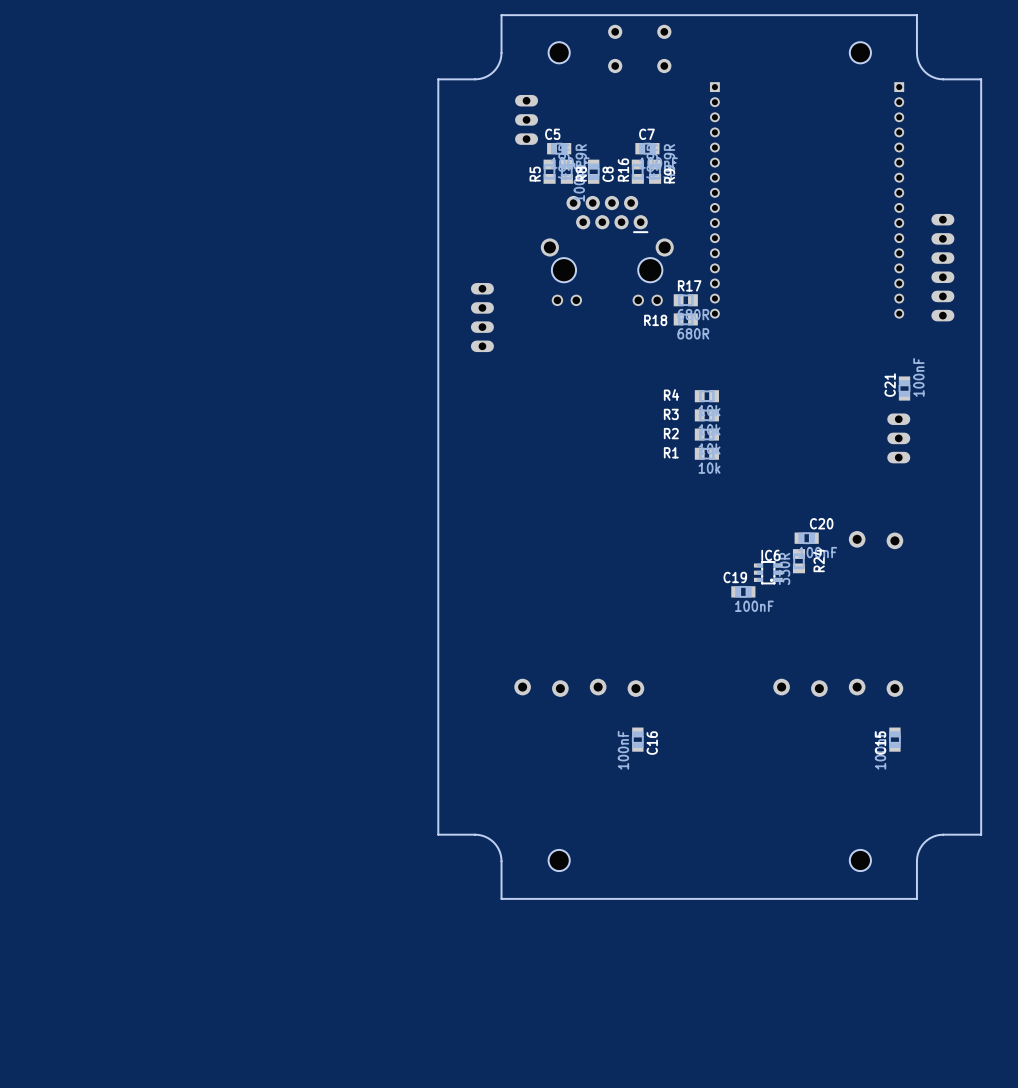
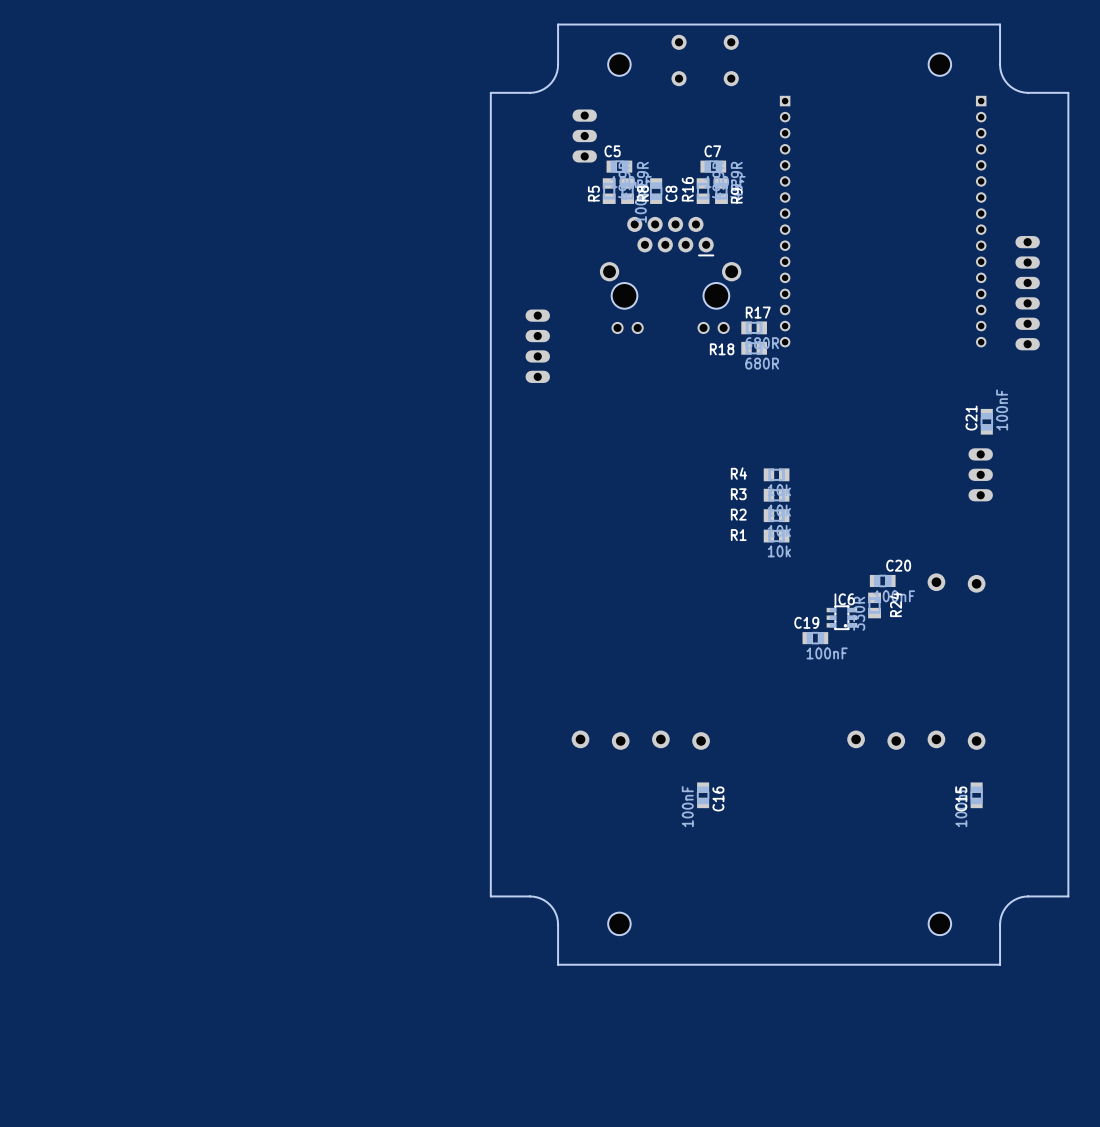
R4 position: (706, 396) -> (776, 474)
R3 position: (706, 415) -> (776, 495)
R2 position: (706, 434) -> (776, 515)
R1 position: (706, 453) -> (776, 536)

